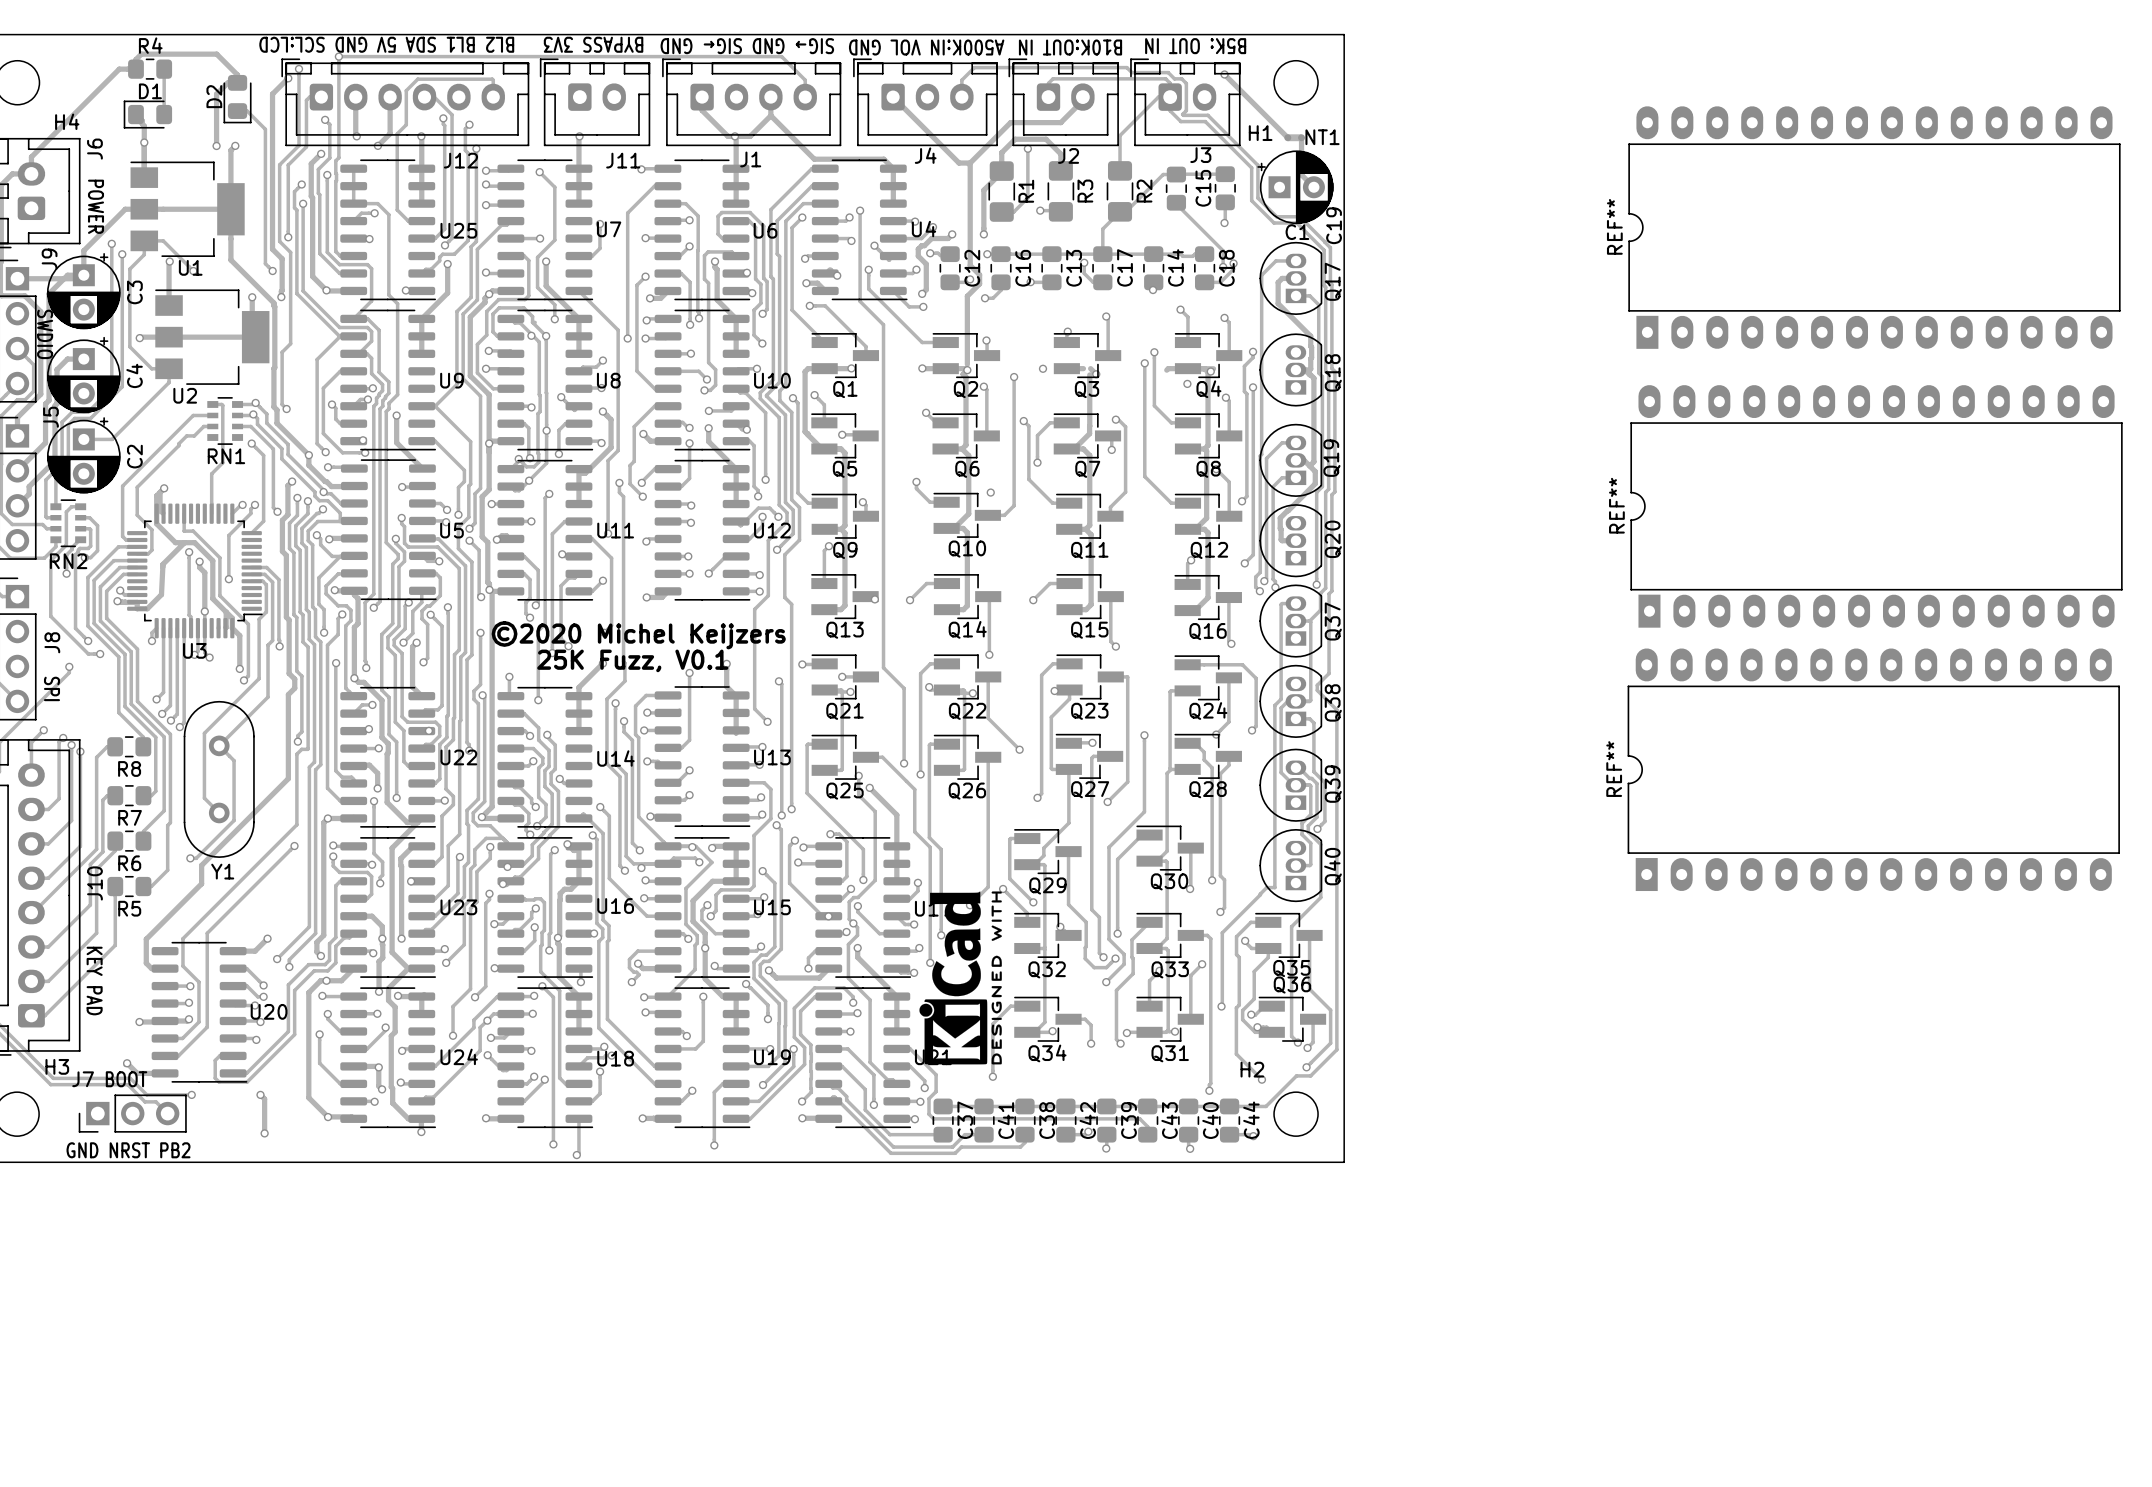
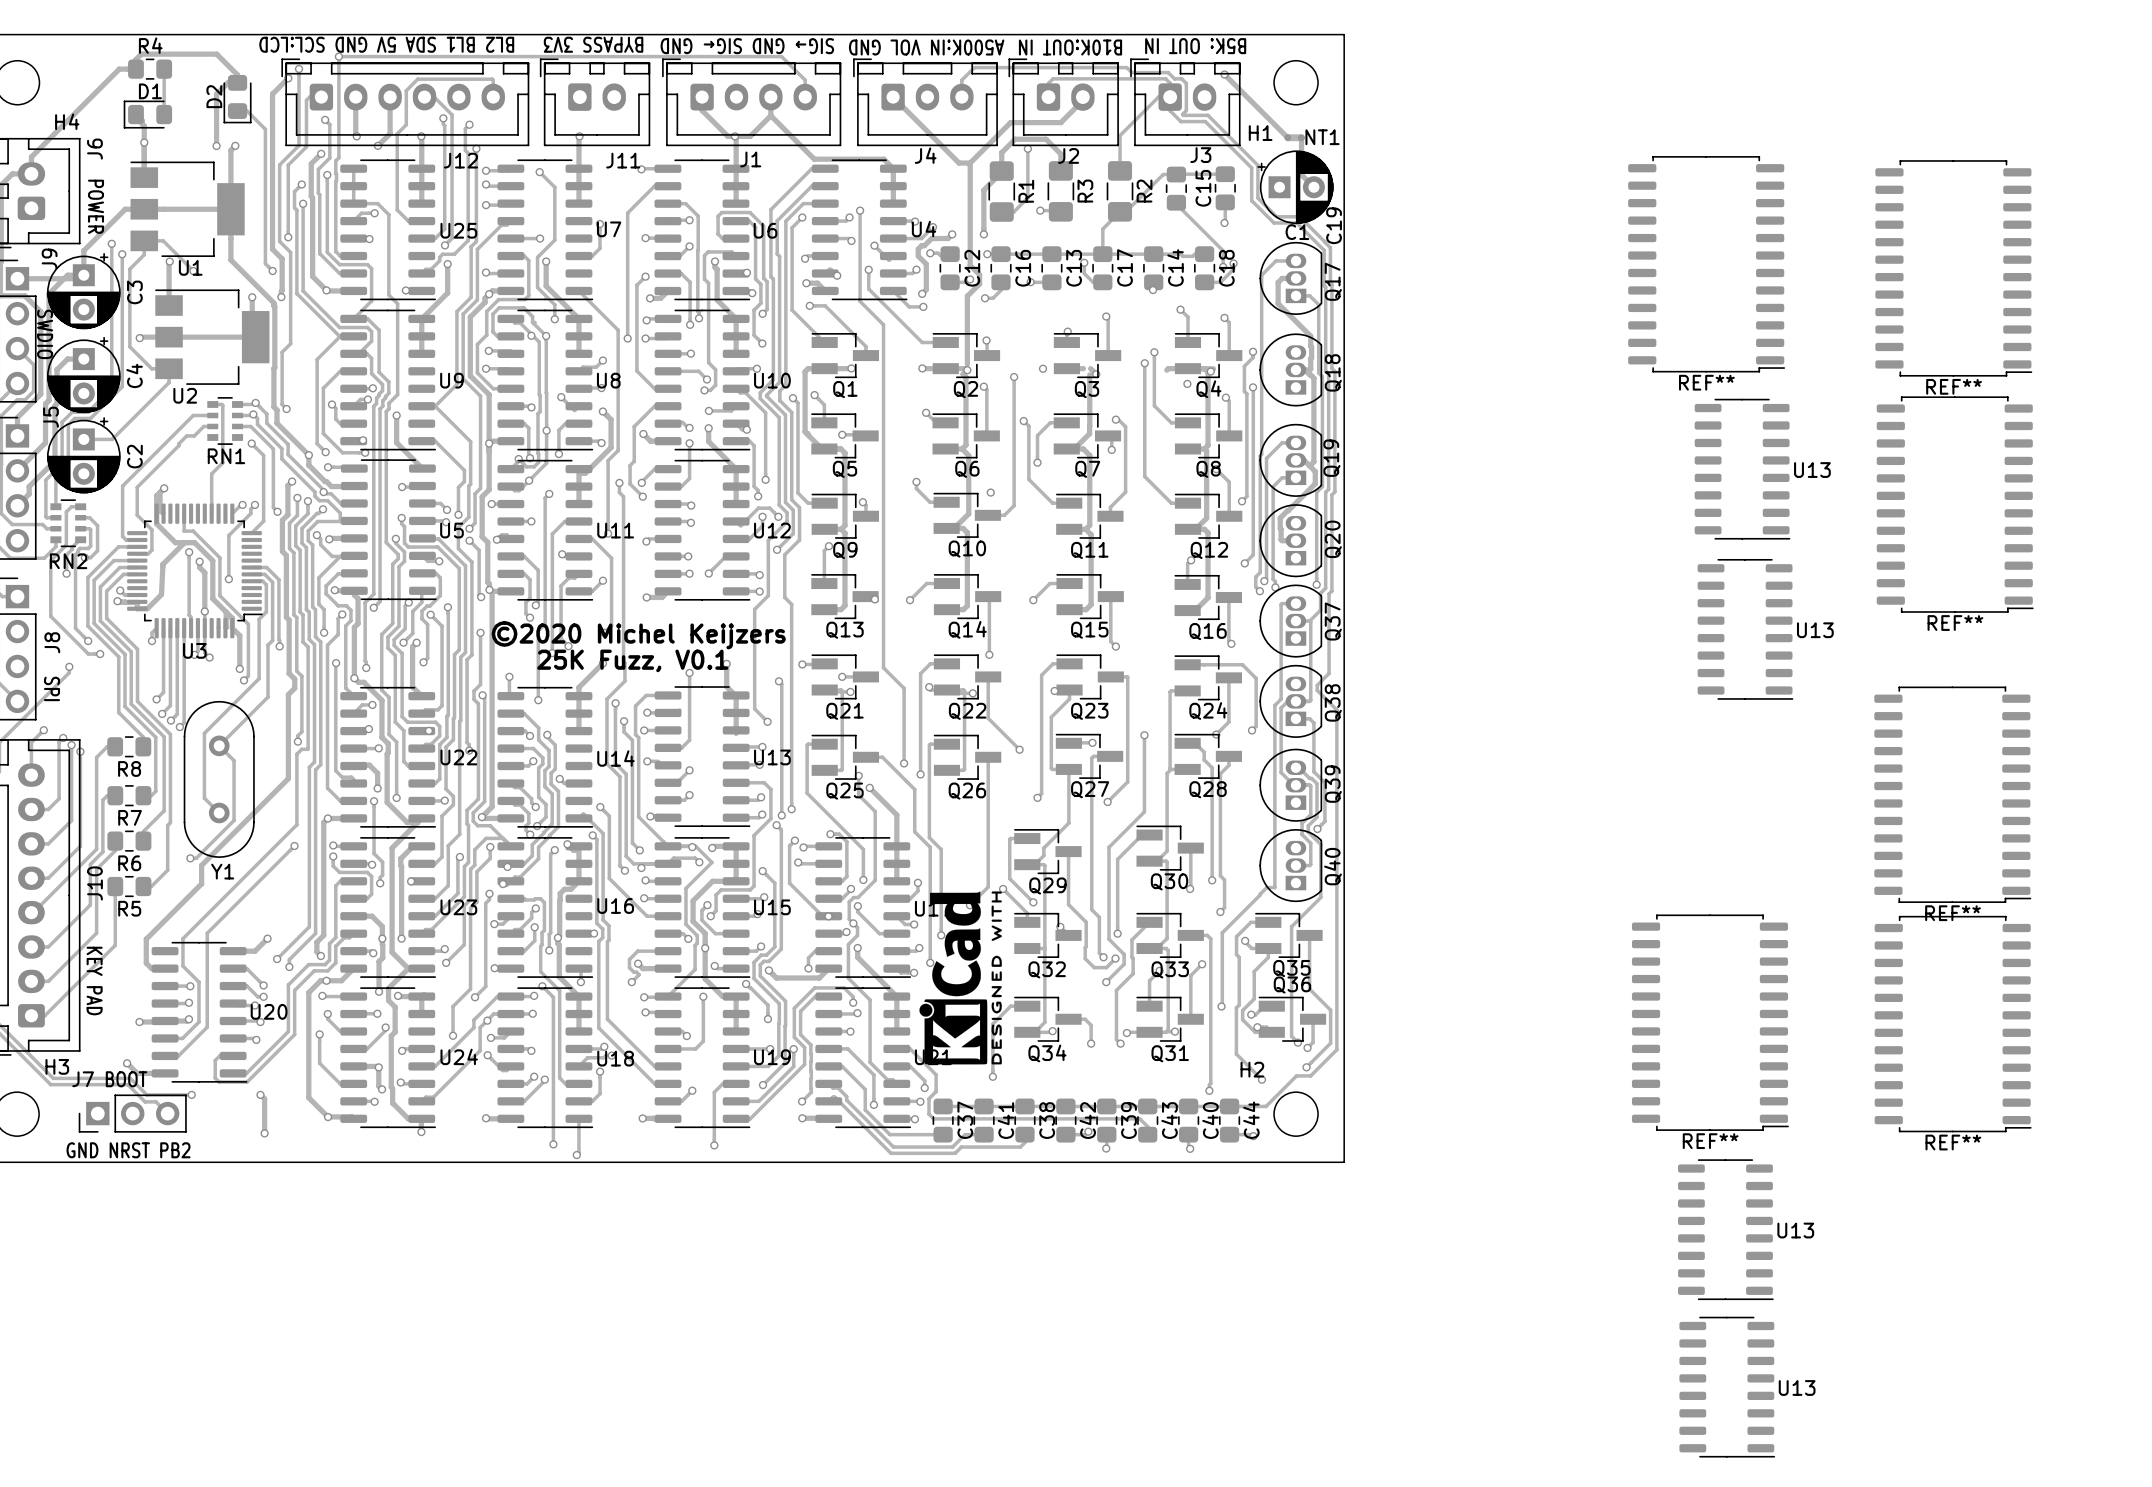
REF**: (1874, 227) -> none
REF**: none -> (1706, 264)
REF**: none -> (1953, 268)
U13: none -> (1742, 469)
REF**: none -> (1955, 504)
REF**: (1876, 506) -> none
U13: none -> (1745, 629)
REF**: (1873, 769) -> none
REF**: none -> (1952, 794)
REF**: none -> (1710, 1022)
REF**: none -> (1953, 1024)
U13: none -> (1725, 1229)
U13: none -> (1727, 1387)

